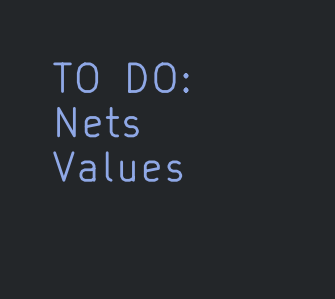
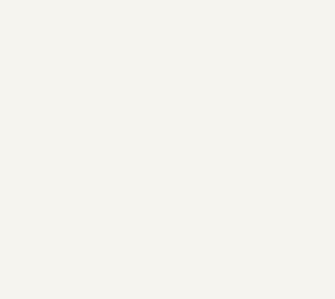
text: TO DO: (120, 77) -> none
text: Nets (97, 122) -> none
text: Values (117, 166) -> none

